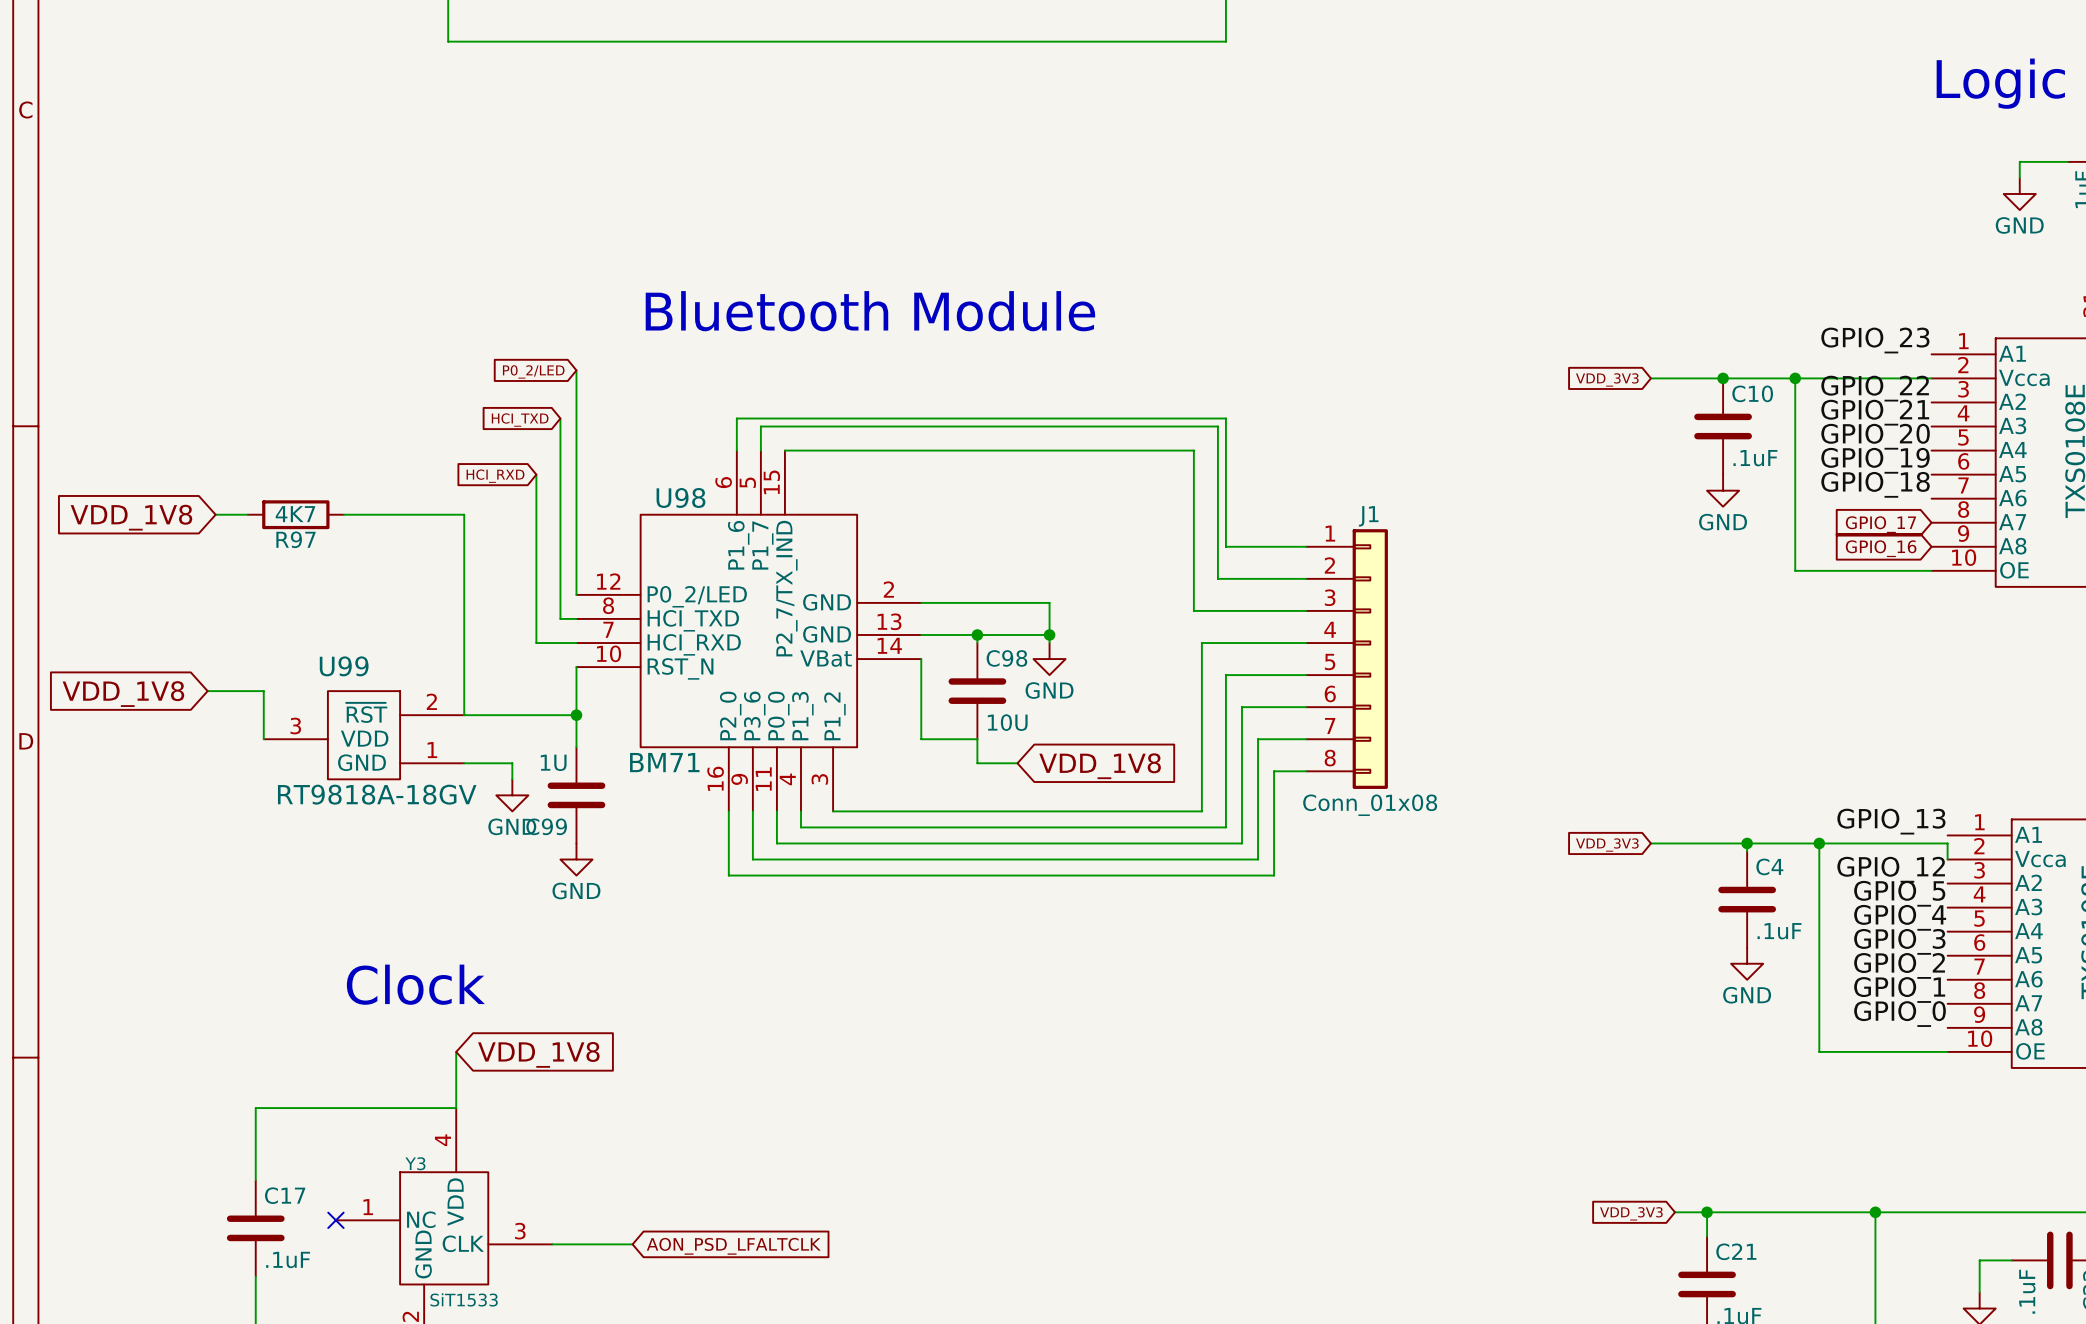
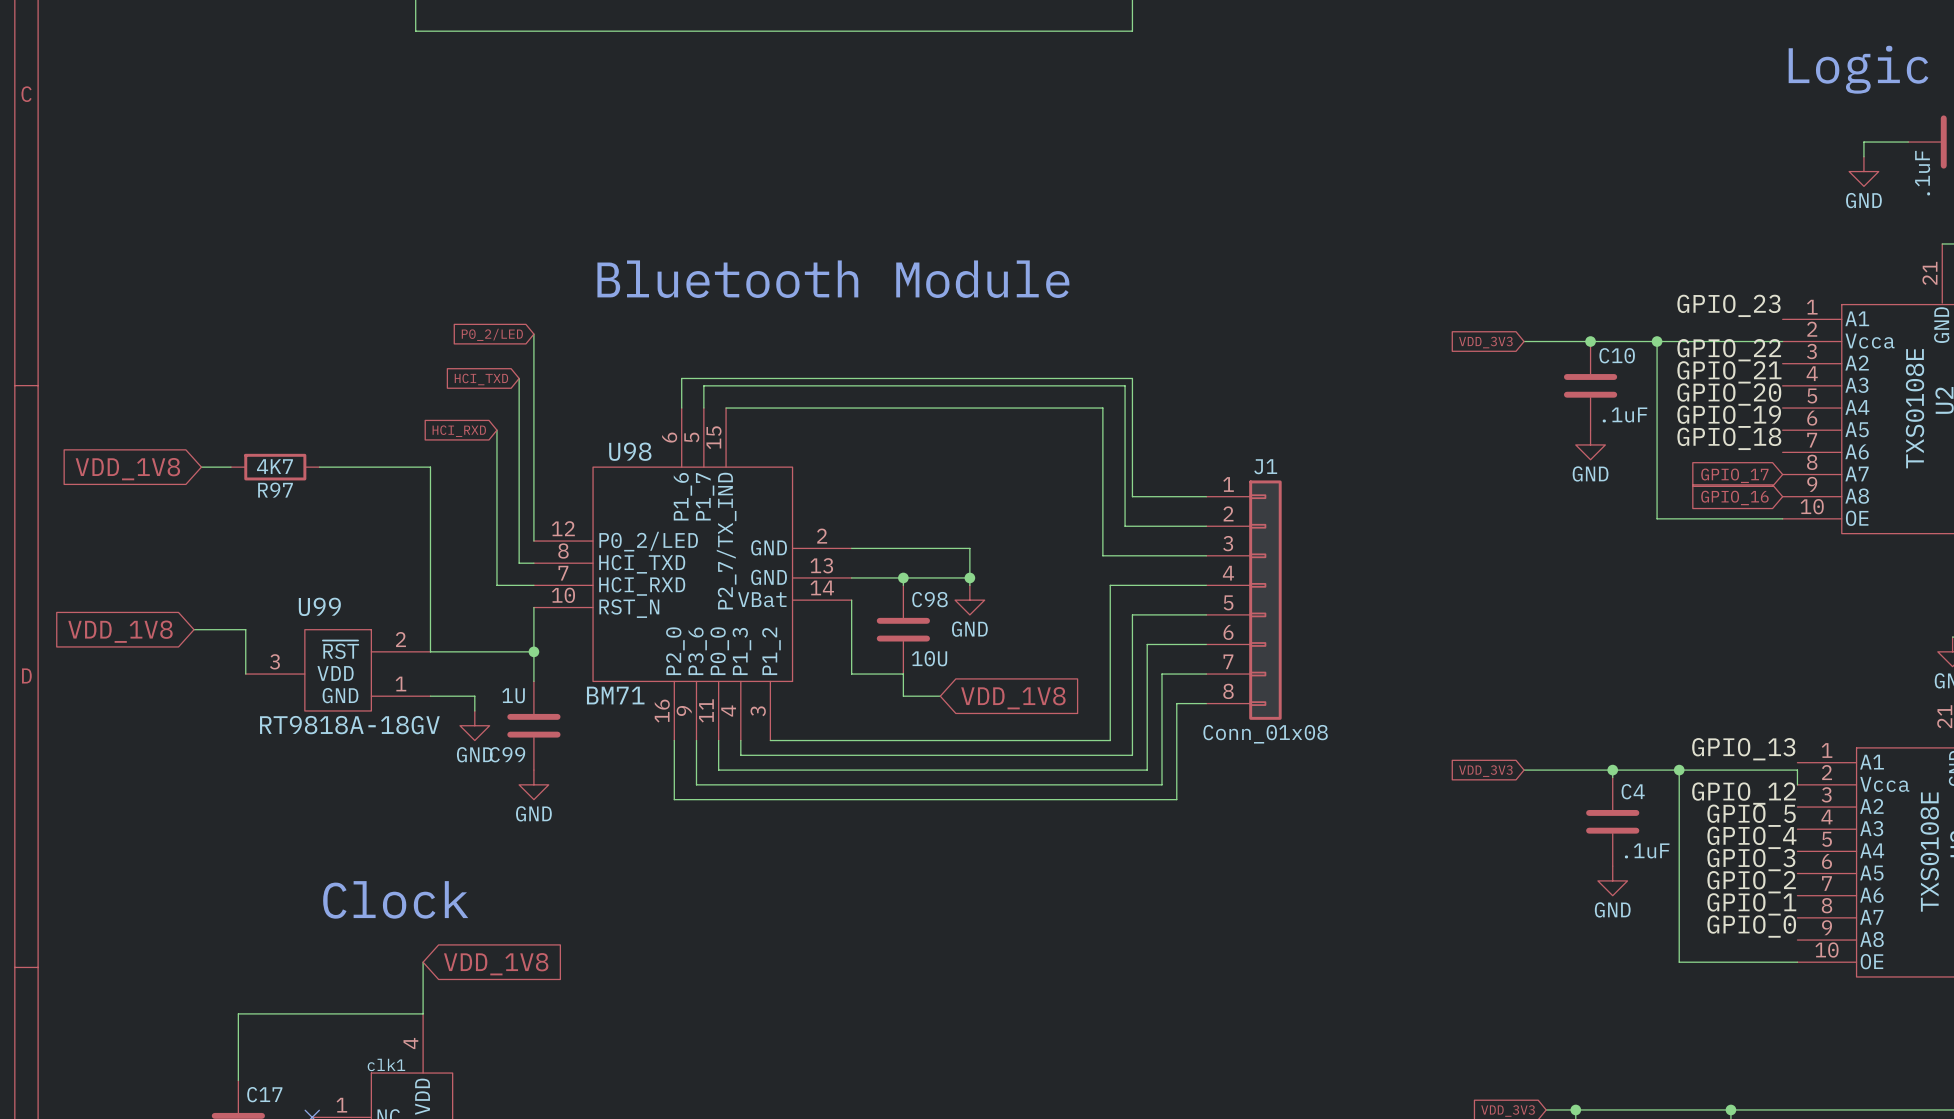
Y3 name: Y3 (415, 1163) -> clk1 (386, 1064)

